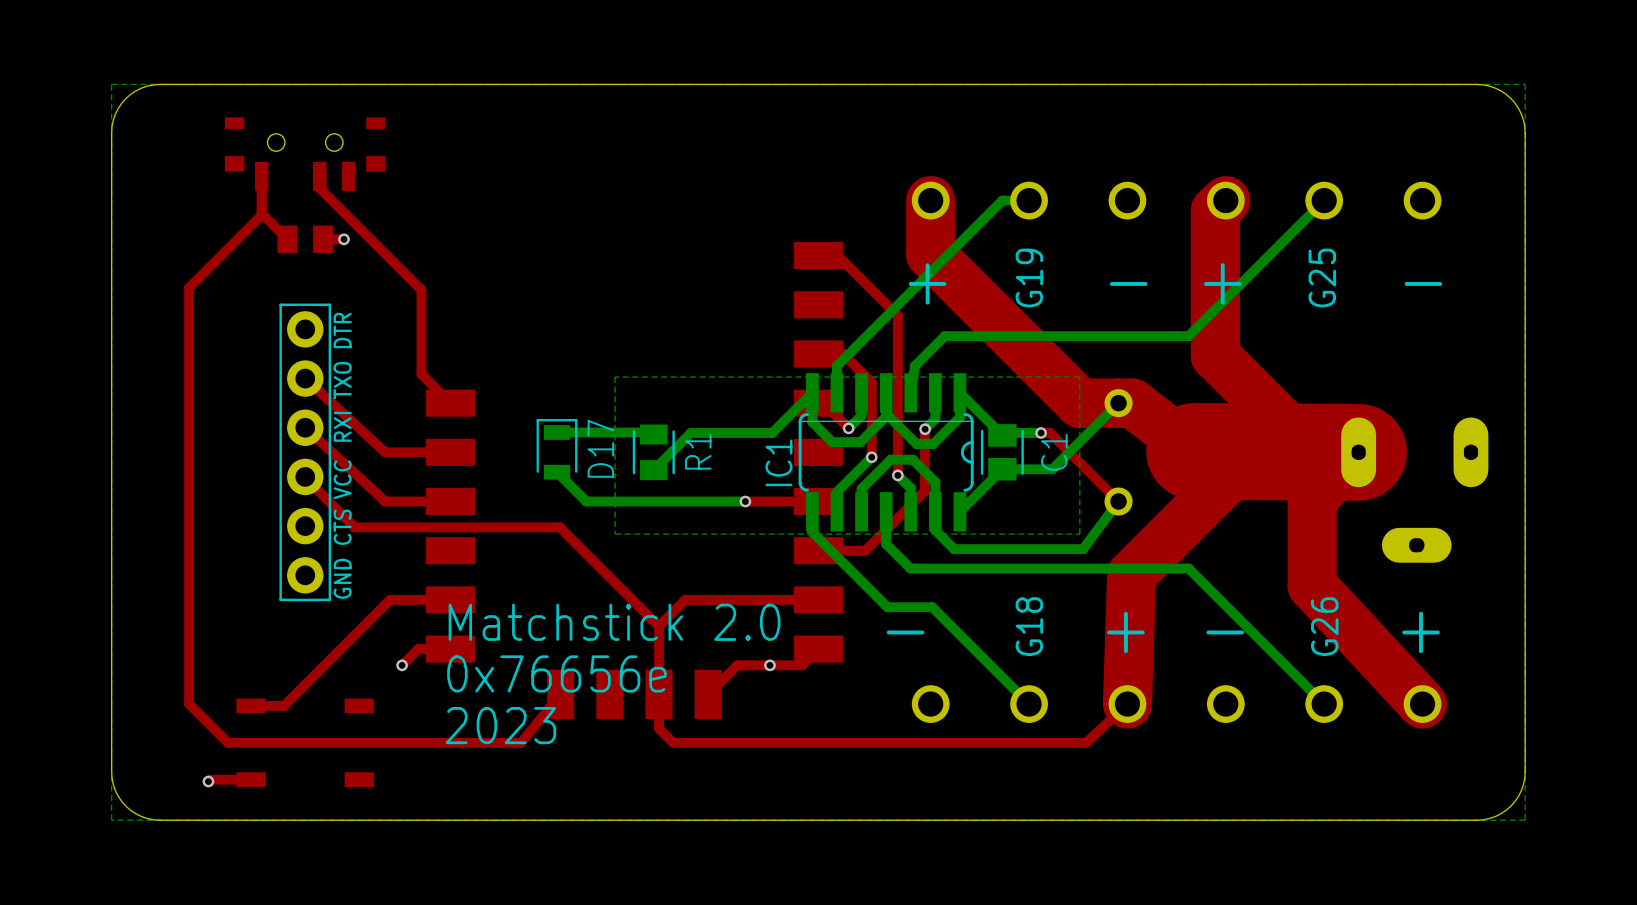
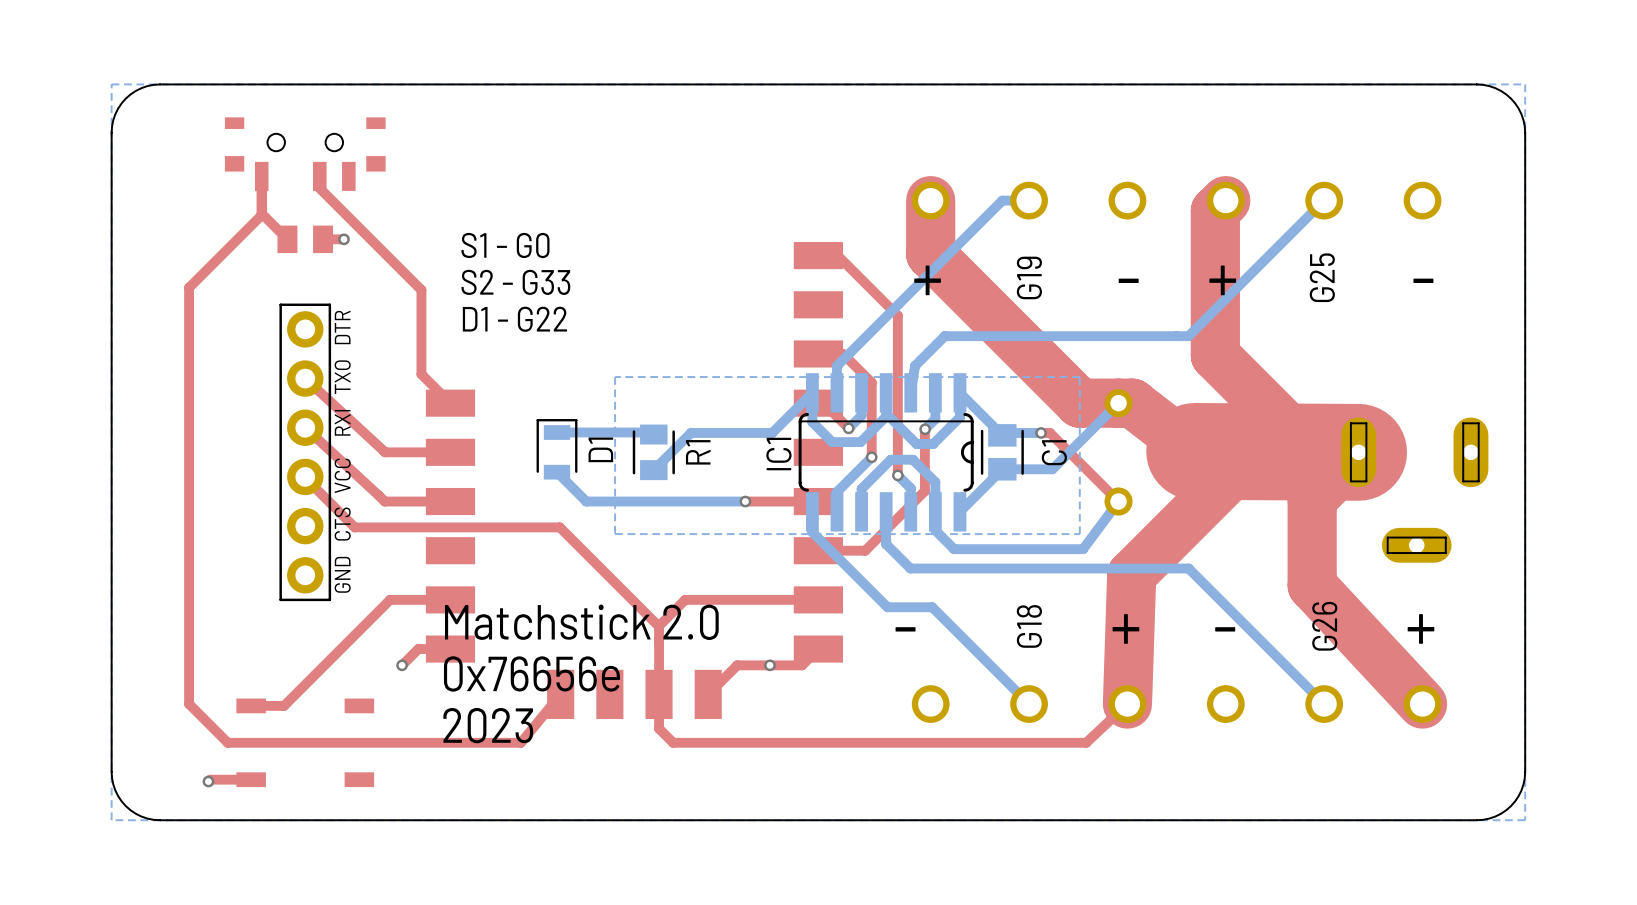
text: none -> S1 - G0 (505, 245)
text: none -> S2 - G33 (515, 282)
text: none -> D1 - G22 (514, 319)
D17 name: D17 (600, 448) -> D1 (600, 449)

